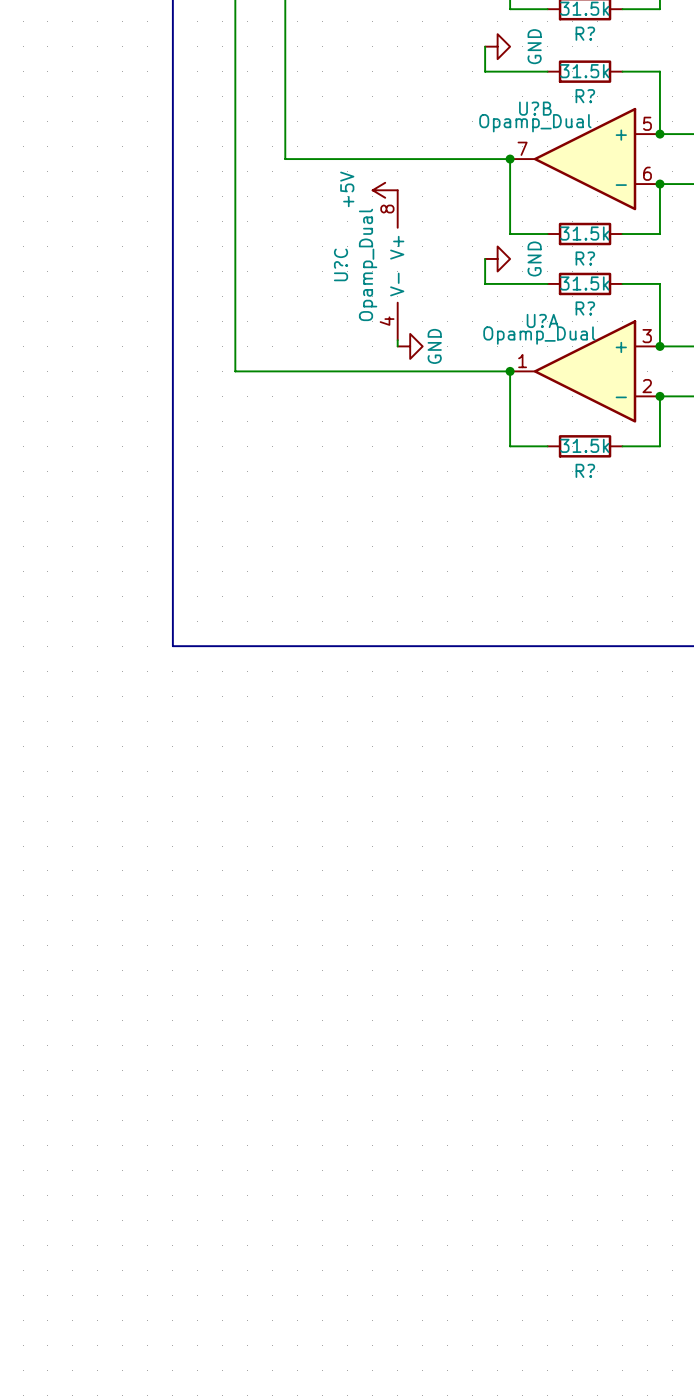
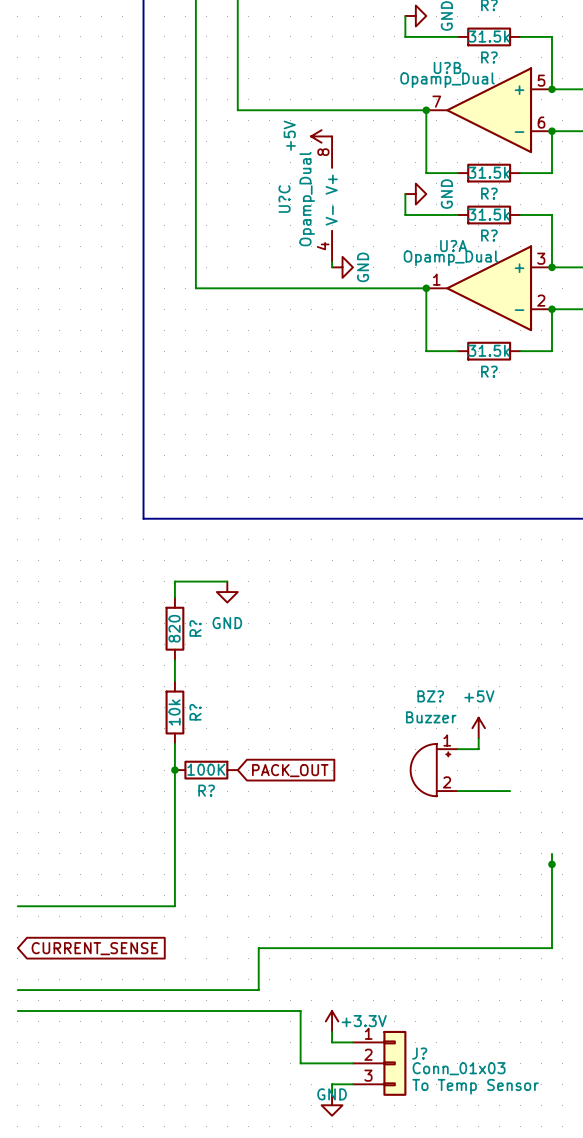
wire: none -> (227, 581) (174, 581) (174, 597)
power symbol: none -> GND (227, 592)
R?: none -> 820 (174, 628)
wire: none -> (174, 660) (174, 681)
R?: none -> 10k (174, 712)
power symbol: none -> +5V (478, 728)
wire: none -> (478, 738) (478, 749) (457, 749)
wire: none -> (174, 743) (174, 906) (17, 906)
junction: none -> (174, 770)
R?: none -> 100K (206, 770)
BZ?: none -> Buzzer (434, 770)
global label: none -> PACK_OUT (290, 770)
wire: none -> (457, 791) (510, 791)
wire: none -> (552, 853) (552, 948) (258, 948) (258, 990) (17, 990)
junction: none -> (552, 864)
global label: none -> CURRENT_SENSE (94, 948)
wire: none -> (17, 1011) (300, 1011) (300, 1063) (353, 1063)
power symbol: none -> +3.3V (332, 1021)
wire: none -> (332, 1031) (332, 1042) (353, 1042)
J?: none -> Conn_01x03 (379, 1063)
wire: none -> (353, 1084) (332, 1084) (332, 1094)
power symbol: none -> GND (332, 1105)

